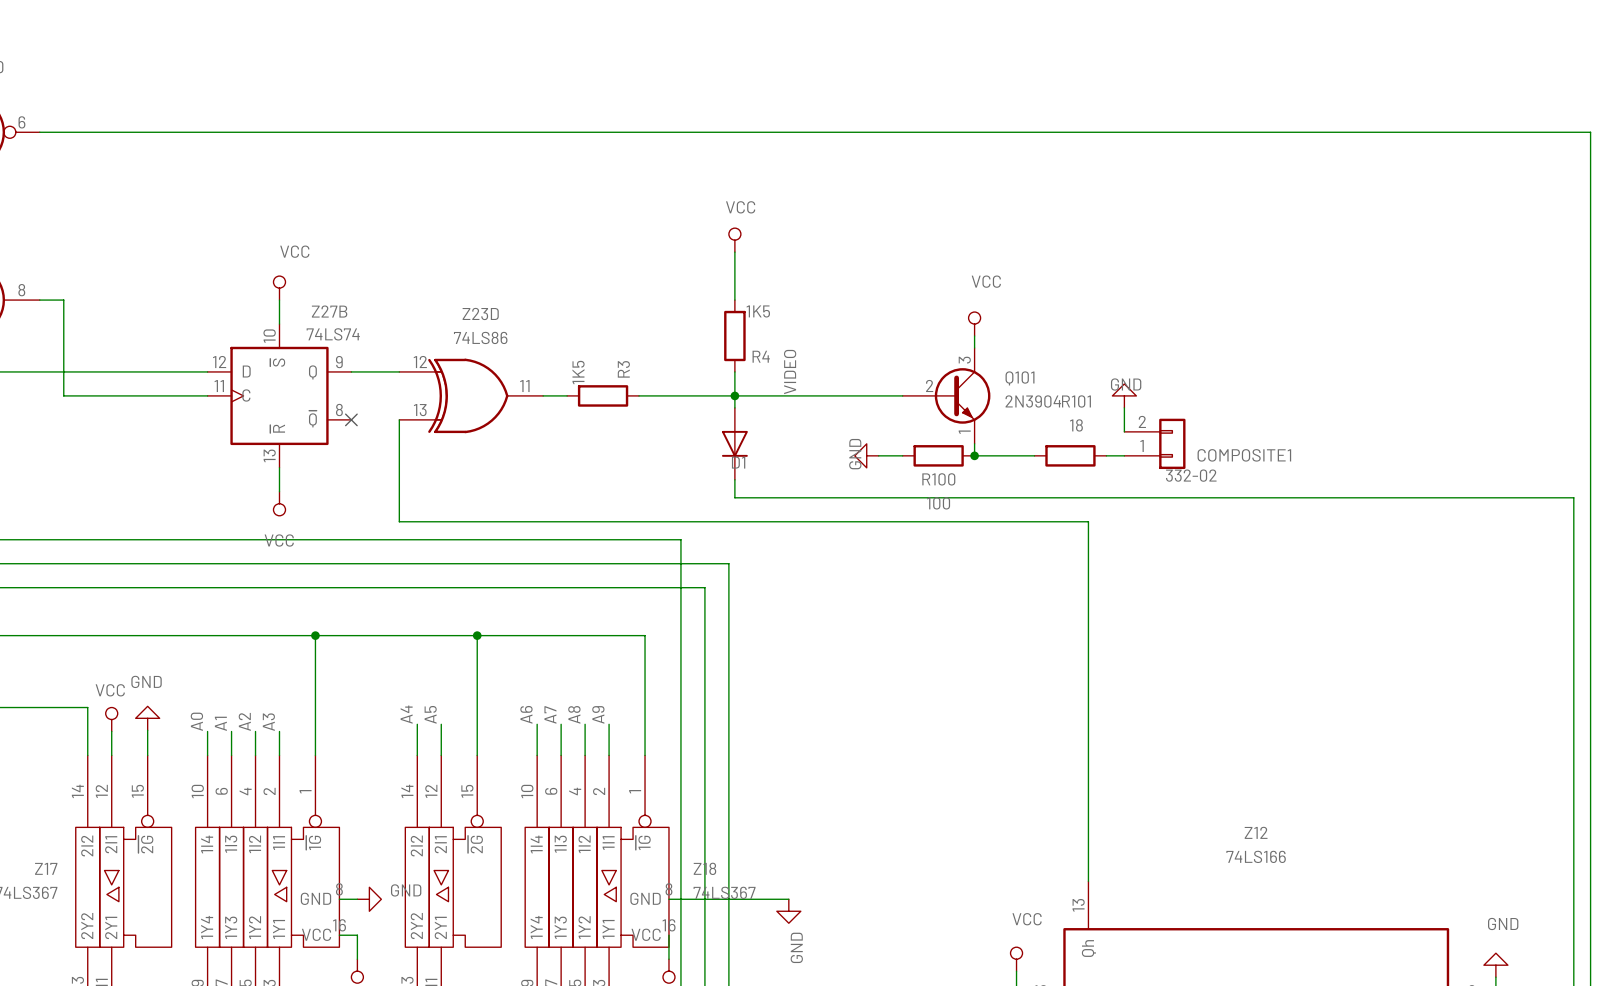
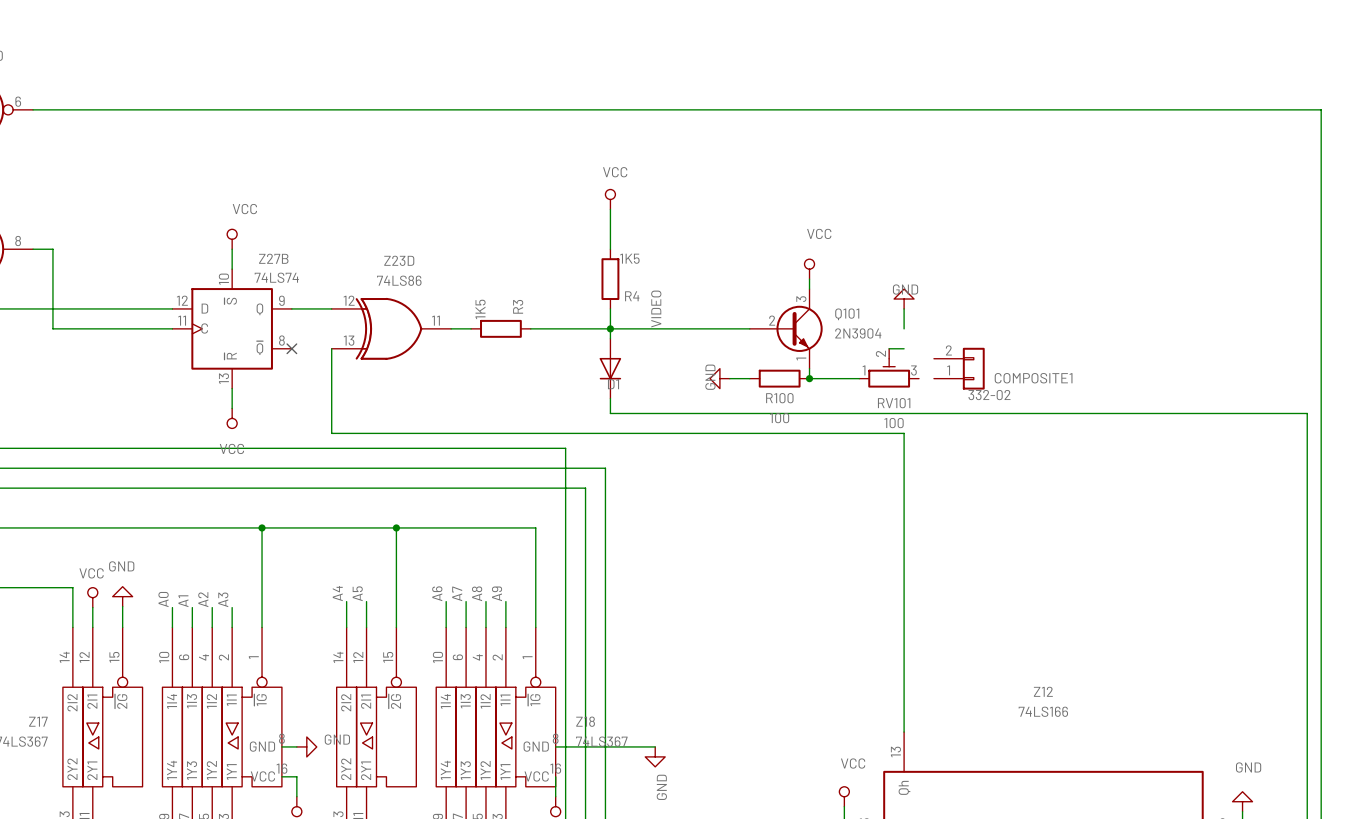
power symbol position: GND (1124, 395) -> GND (904, 299)
wire: (1124, 407) (1124, 431) -> (904, 308) (904, 328)
RV101: none -> 100 (889, 368)
R101: 18 (1070, 455) -> none
wire: (1106, 455) (1124, 455) -> (889, 348) (904, 348)

